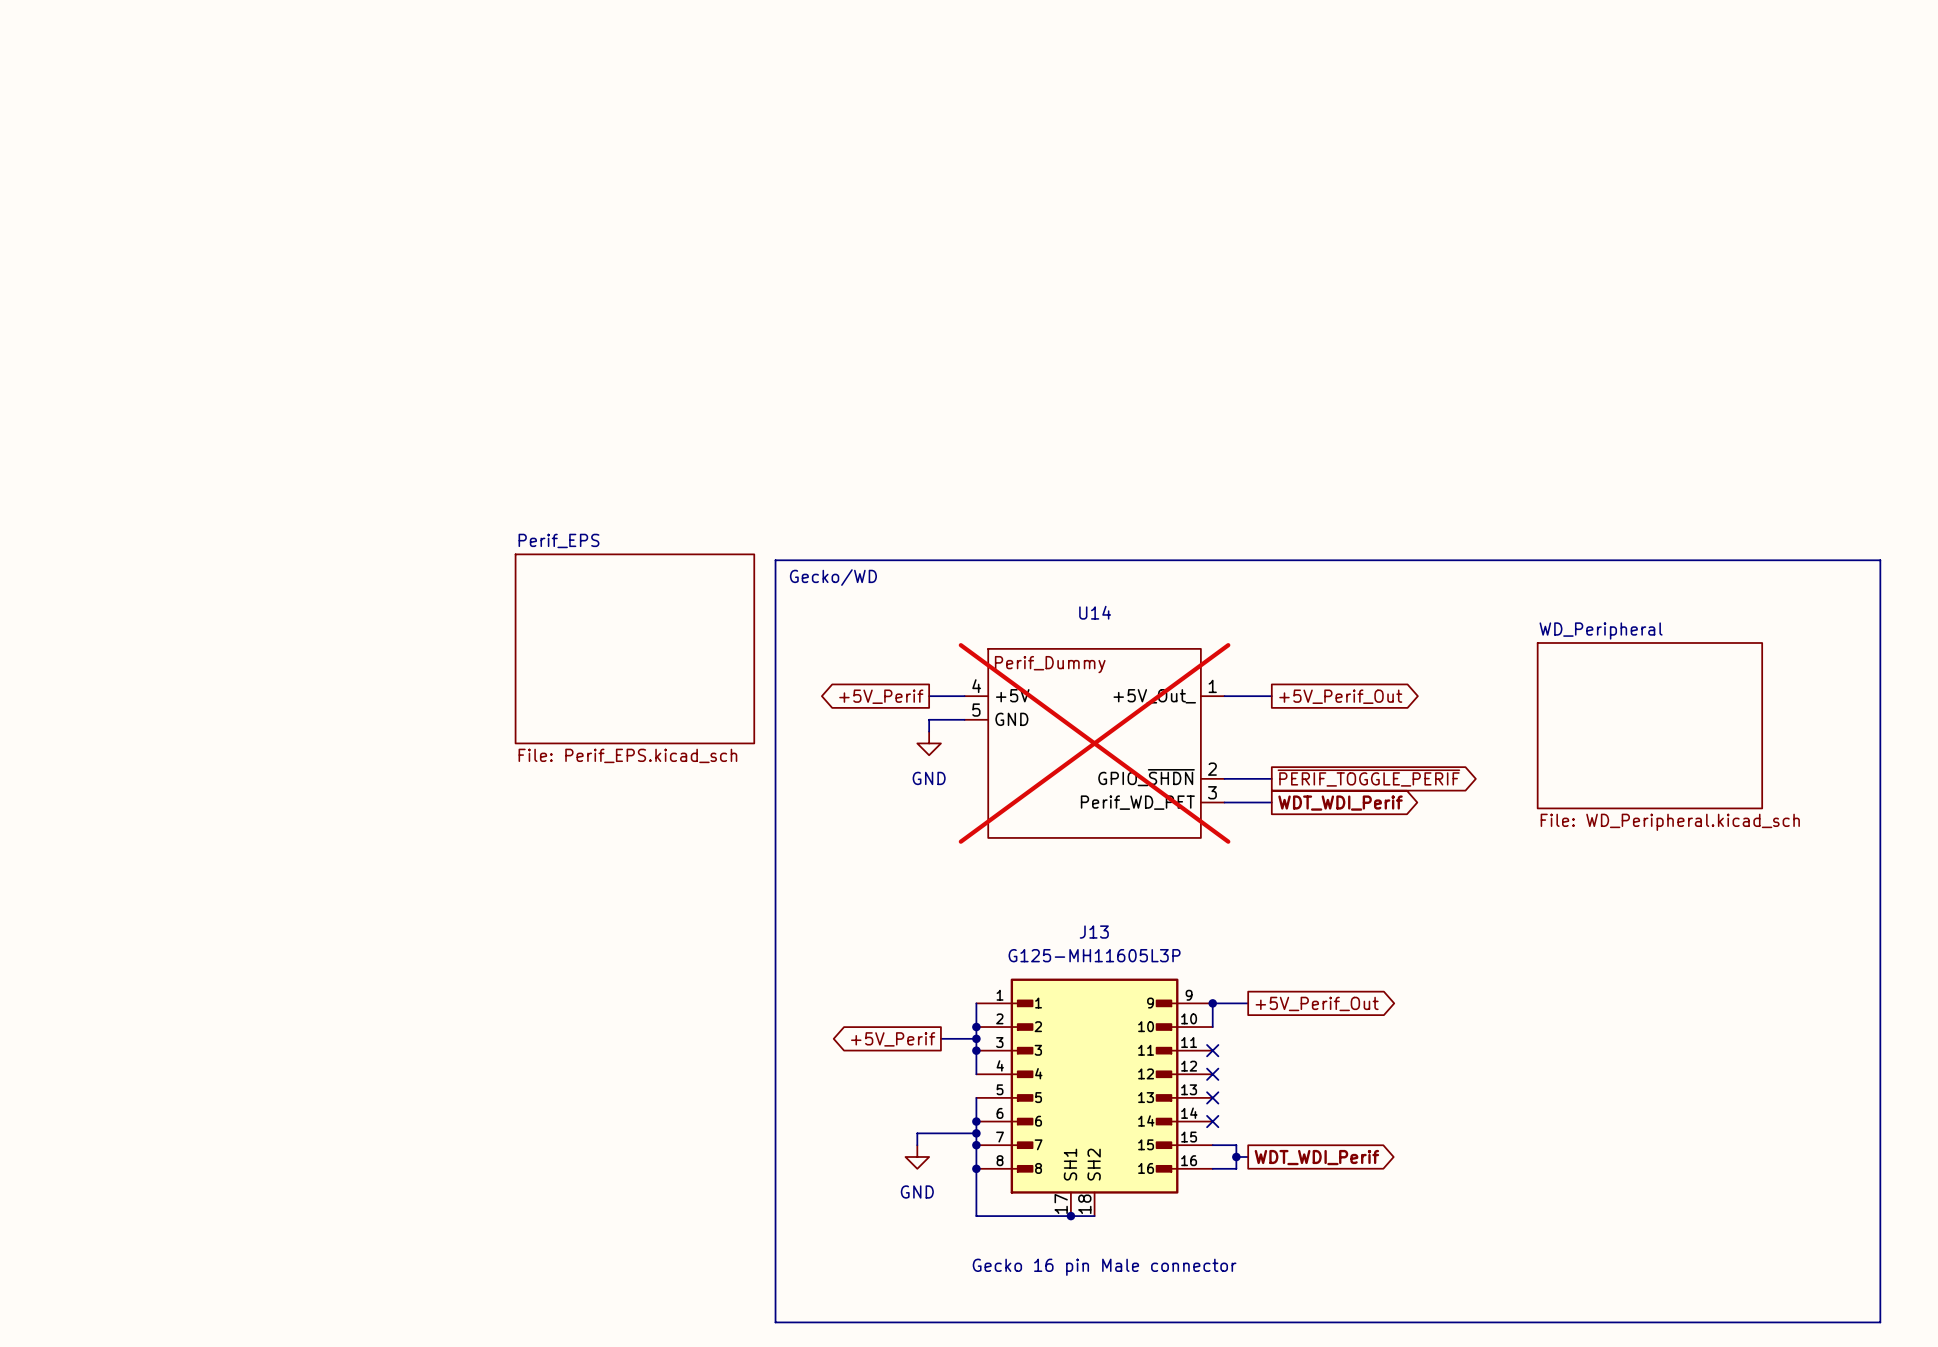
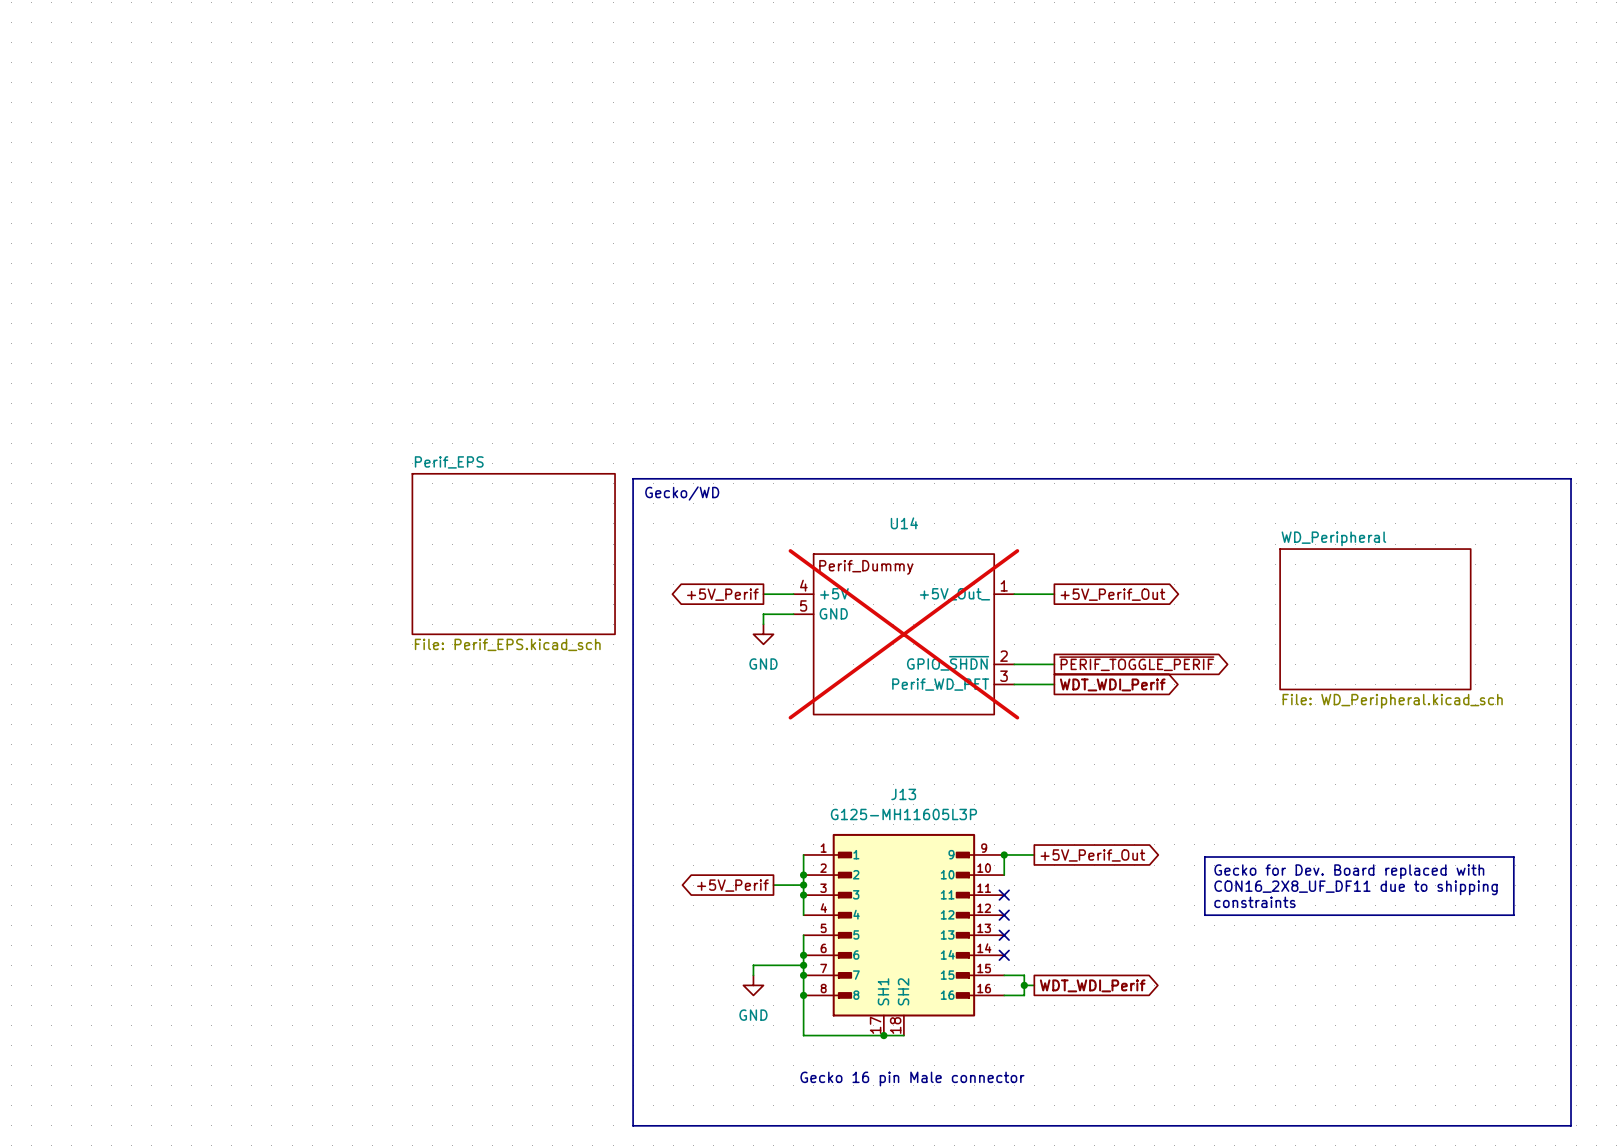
line: none -> (1204, 857) (1513, 857) (1513, 915) (1204, 915) (1204, 857)
text: none -> Gecko for Dev. Board replaced with (1349, 871)
text: none -> CON16_2X8_UF_DF11 due to shipping (1356, 887)
text: none -> constraints (1254, 902)

